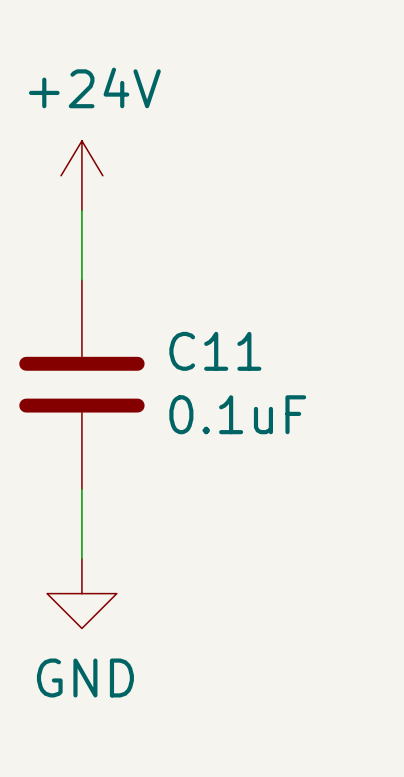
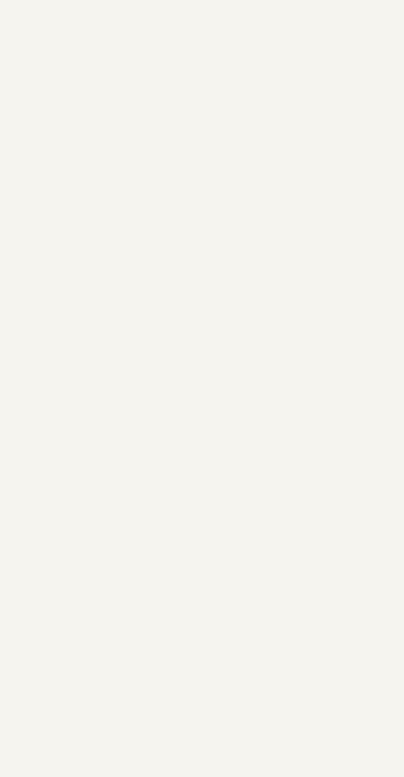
power symbol: +24V (81, 175) -> none
wire: (81, 210) (81, 280) -> none
C11: 0.1uF (81, 384) -> none
wire: (81, 489) (81, 558) -> none
power symbol: GND (81, 593) -> none

